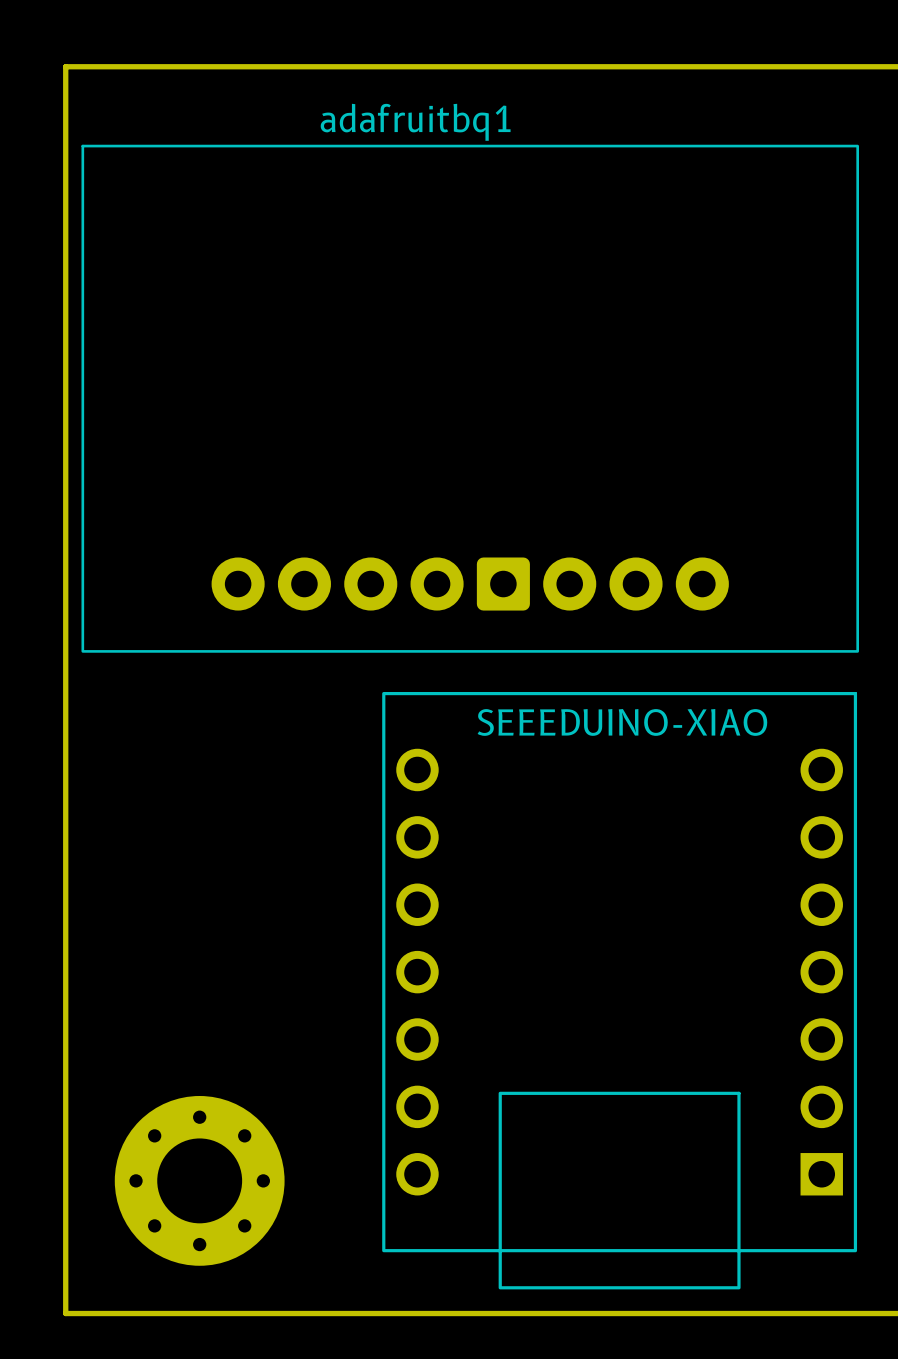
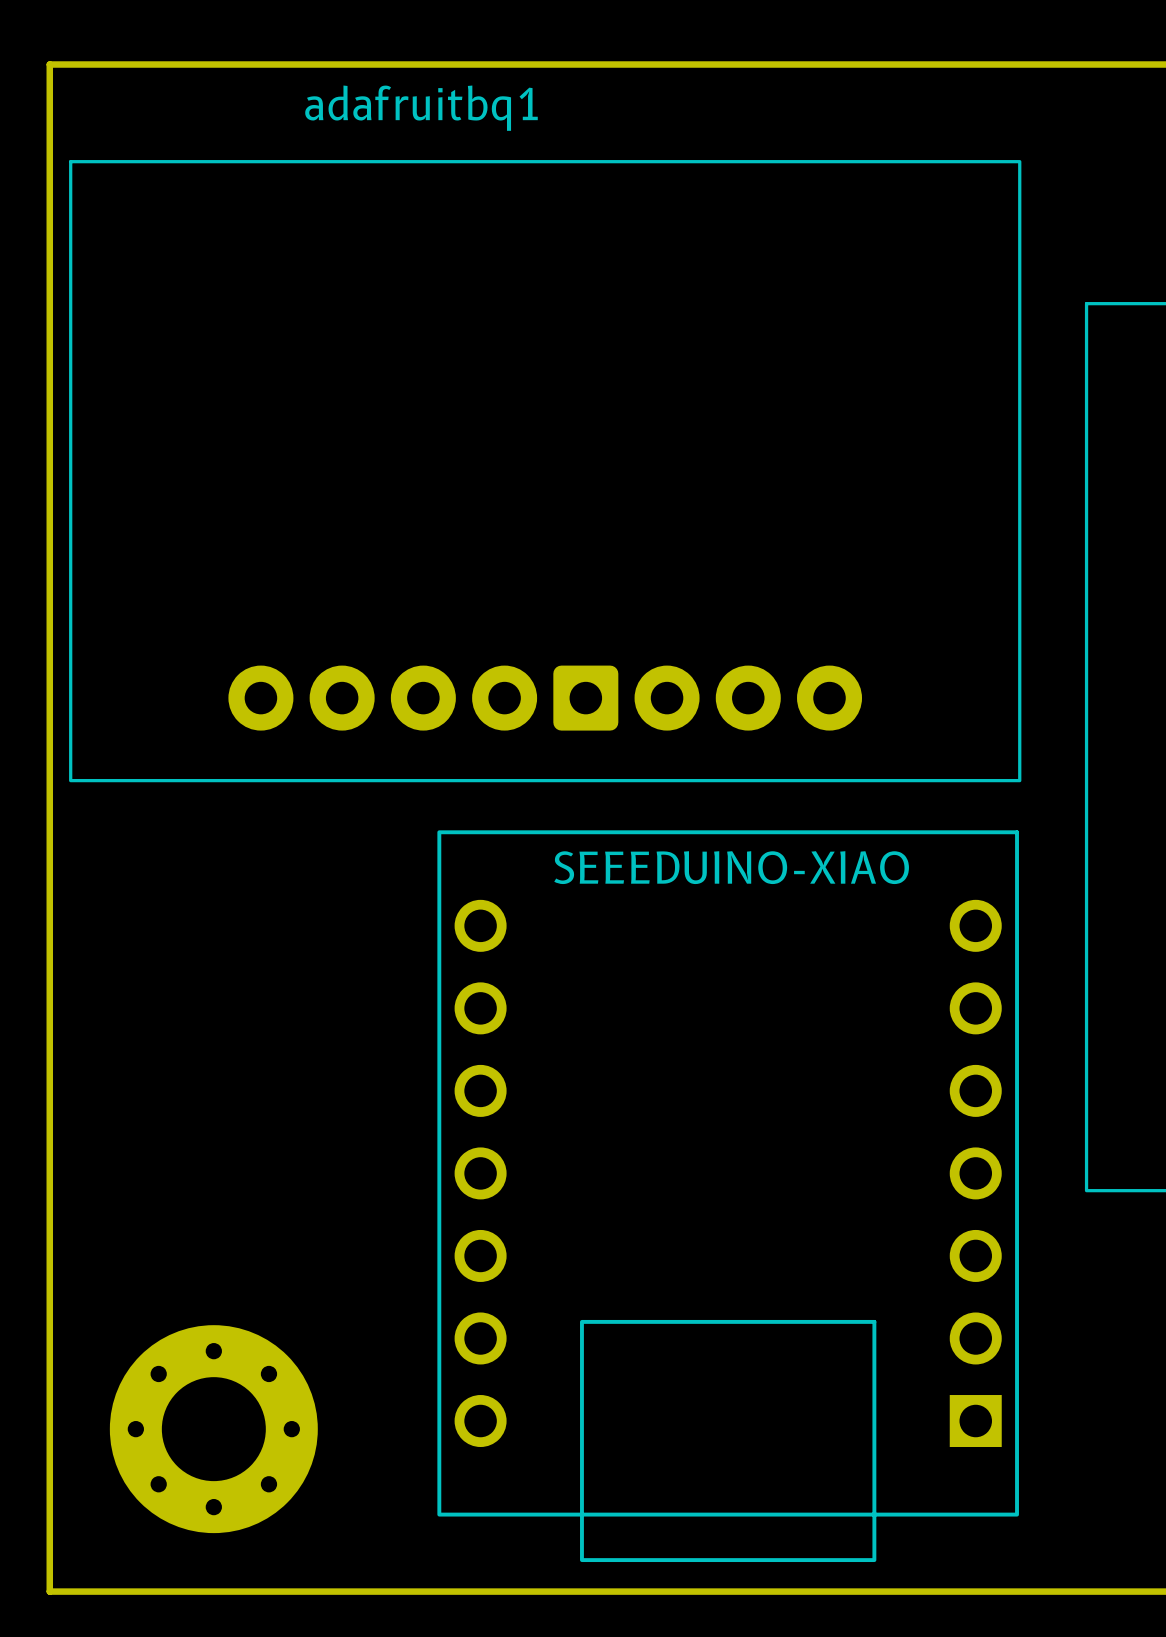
adafruitbq1 name position: adafruitbq1 (415, 122) -> adafruitbq1 (421, 108)

